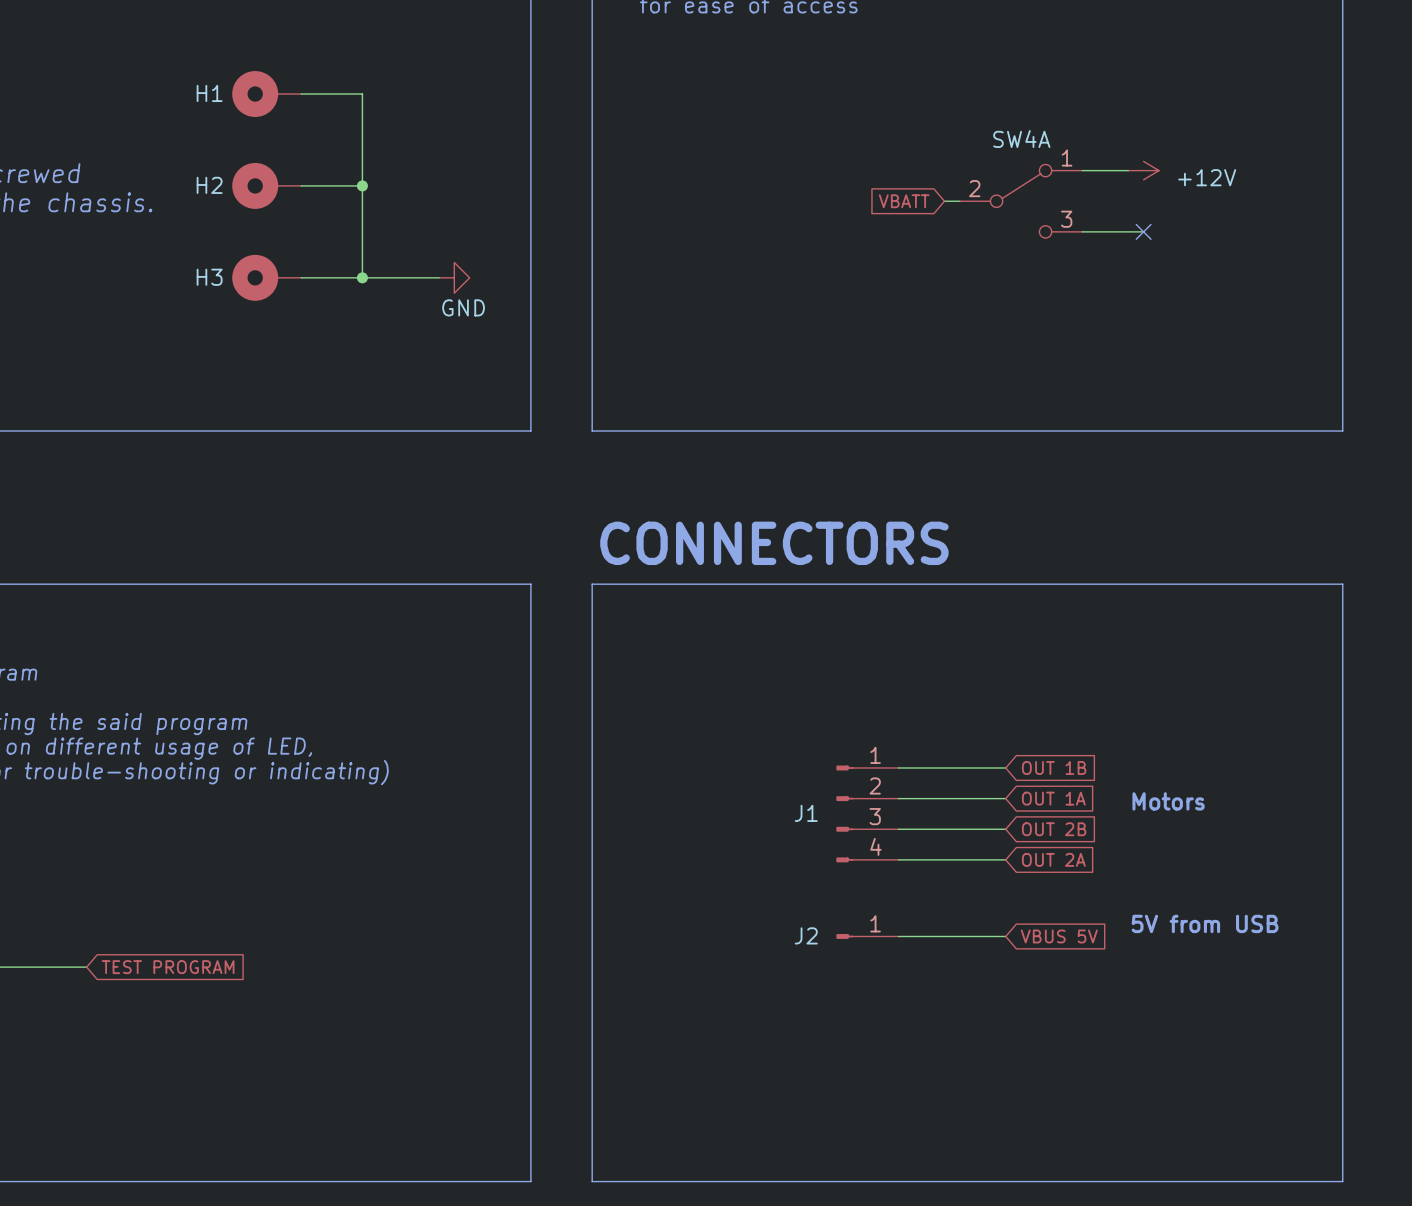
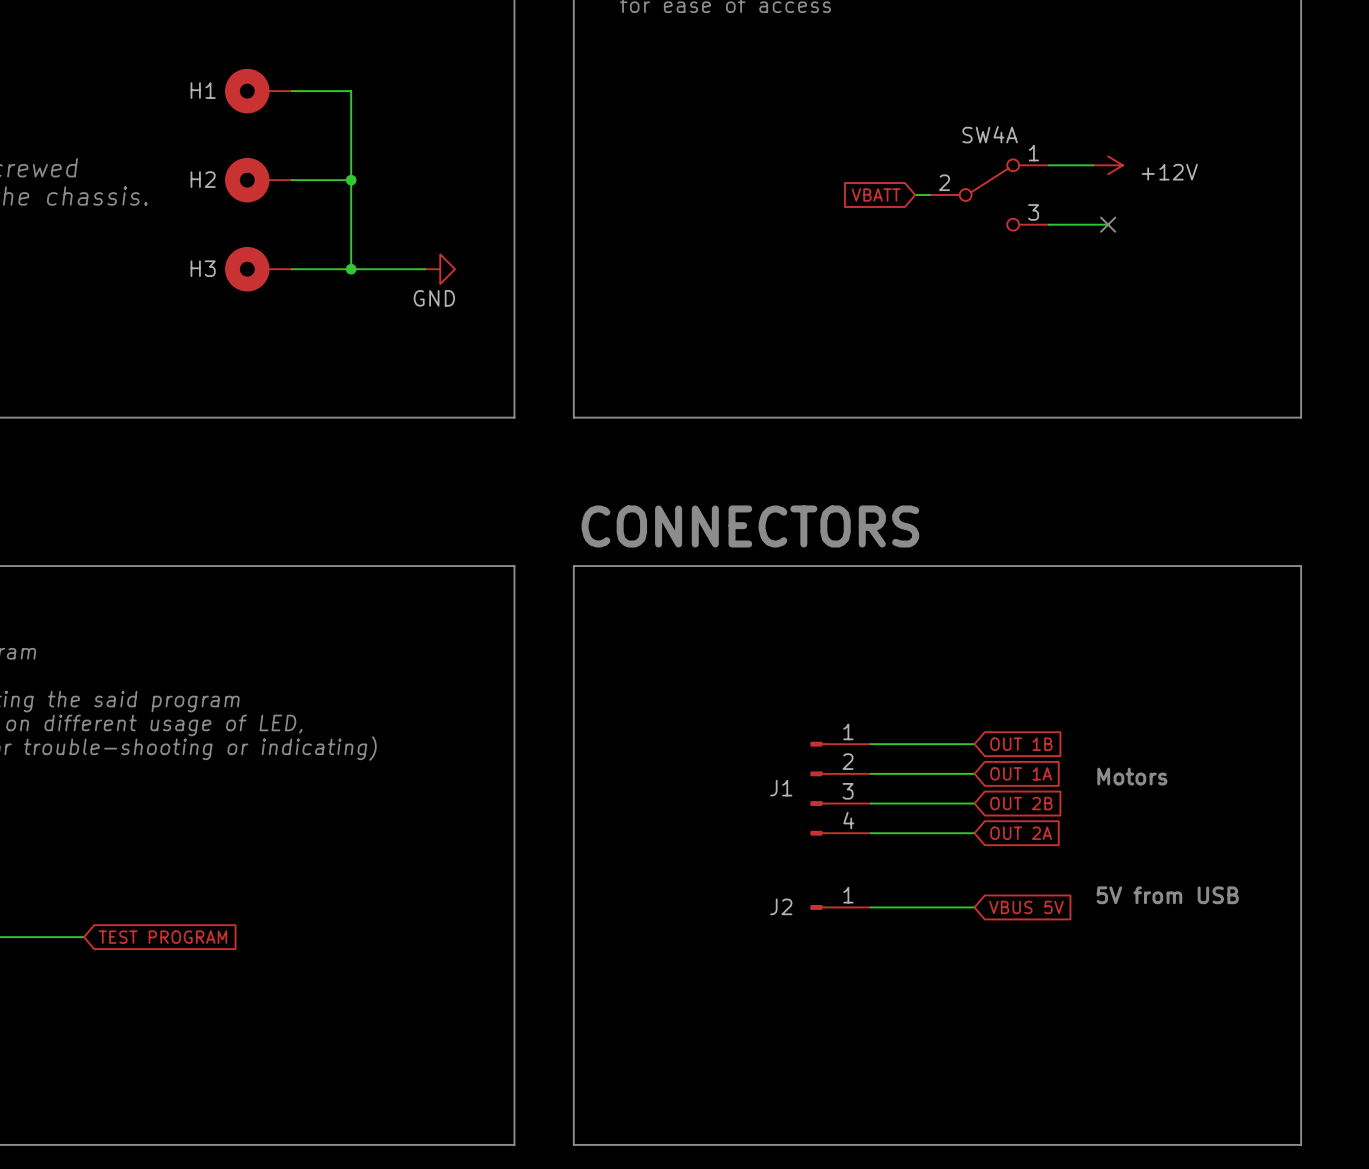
power symbol text position: GND (463, 307) -> GND (434, 298)

